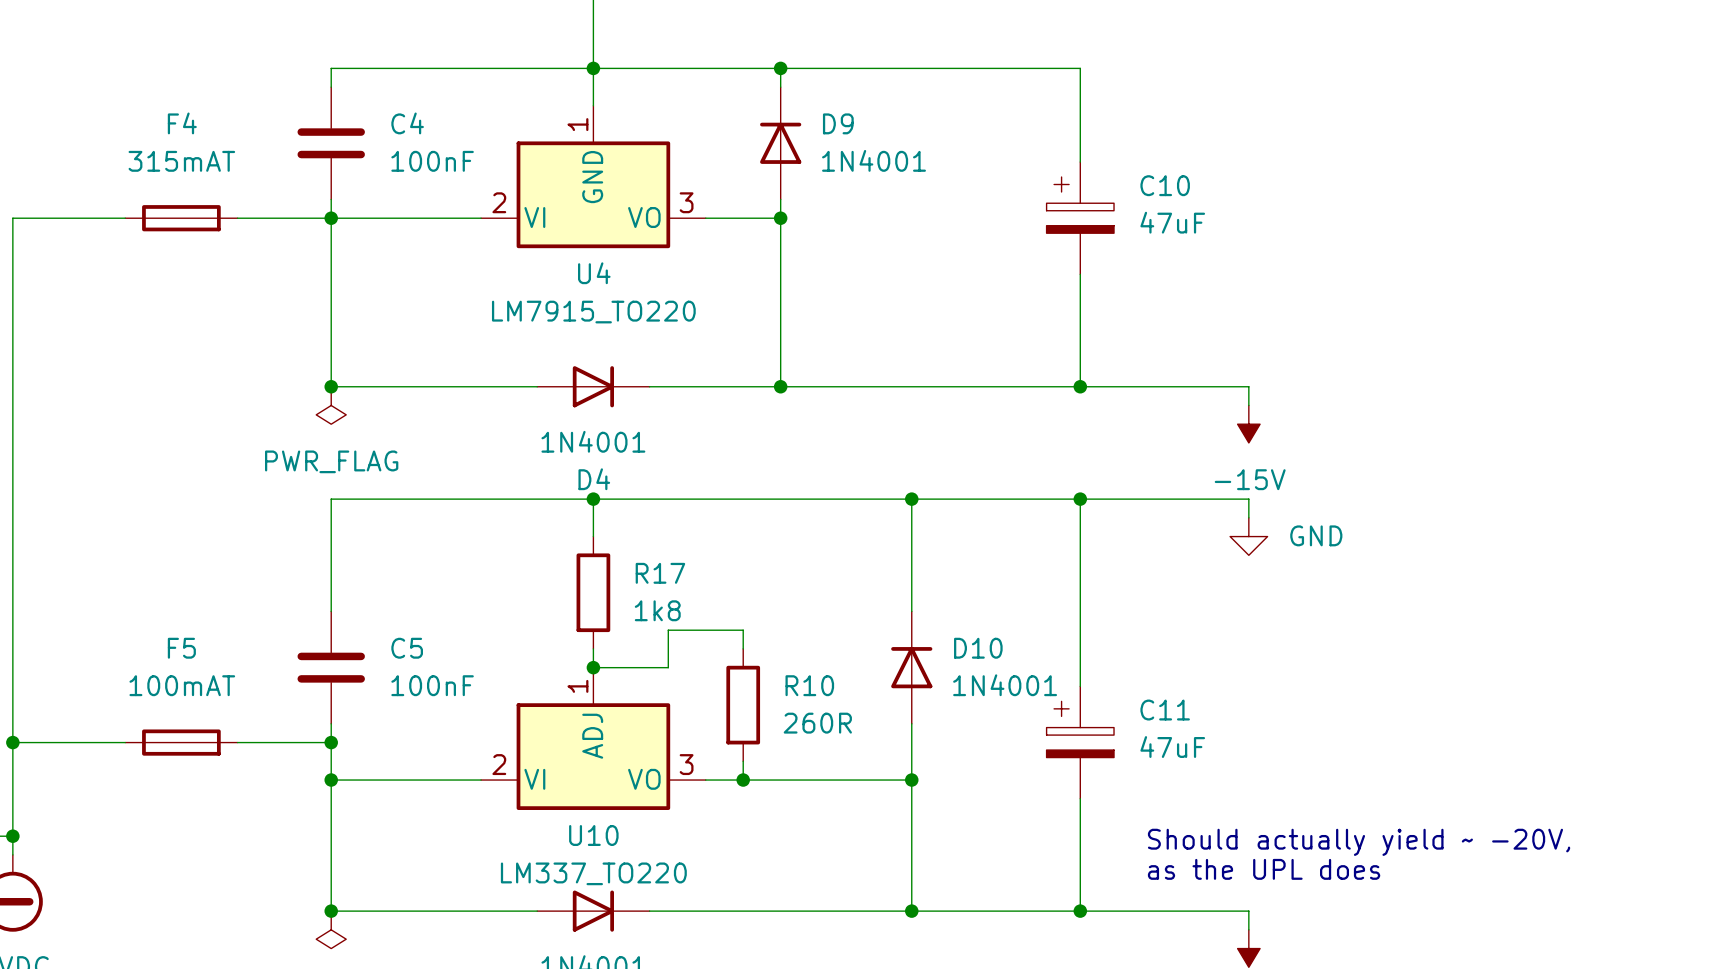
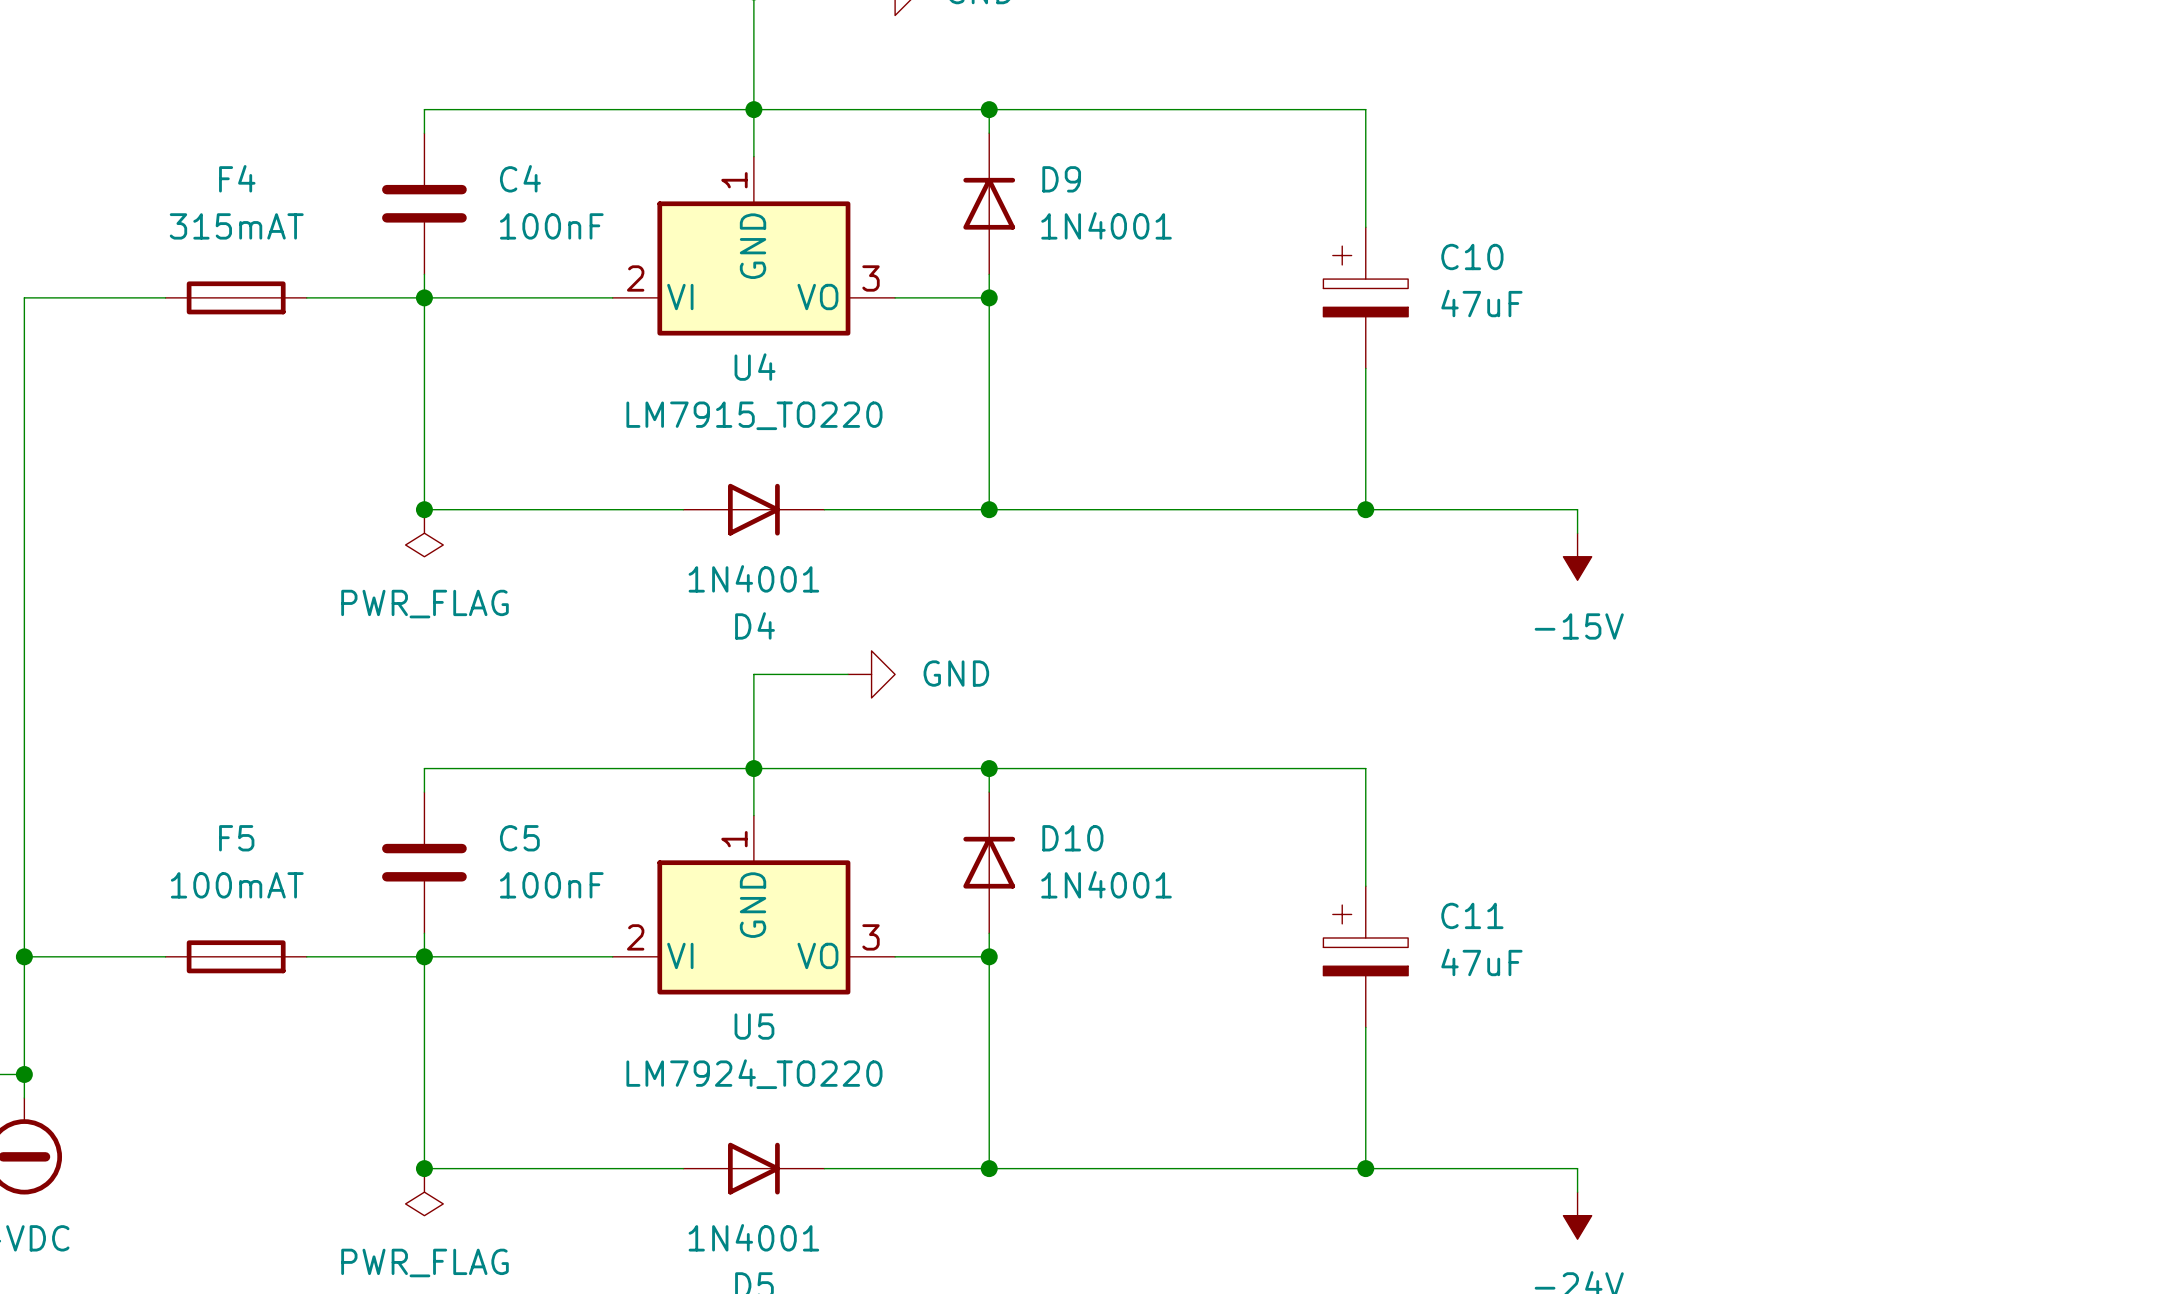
wire: (593, 499) (593, 517) -> (848, 674) (753, 674)
junction: (593, 499) -> none
wire: (911, 499) (911, 611) -> none
junction: (911, 499) -> none
wire: (1080, 499) (1080, 592) -> none
junction: (1080, 499) -> none
power symbol: none -> GND (871, 674)
wire: (1248, 517) (1248, 499) (331, 499) (331, 592) -> (1365, 768) (424, 768)
wire: none -> (753, 697) (753, 815)
power symbol: GND (1248, 536) -> none
junction: none -> (753, 768)
R17: 1k8 (593, 592) -> none
junction: none -> (989, 768)
wire: (593, 648) (593, 667) (668, 667) (668, 630) (743, 630) (743, 648) -> none
junction: (593, 667) -> none
D10 position: (911, 667) -> (989, 862)
U5: none -> LM7924_TO220 (753, 905)
R10: 260R (743, 705) -> none
wire: (911, 723) (911, 911) -> (989, 933) (989, 1168)
U10: LM337_TO220 (593, 738) -> none
wire: none -> (895, 956) (989, 956)
wire: (743, 761) (743, 780) -> (989, 768) (989, 792)
wire: (331, 780) (481, 780) -> (424, 956) (612, 956)
junction: (331, 780) -> none
wire: (705, 780) (911, 780) -> none
junction position: (743, 780) -> (989, 956)
junction: (911, 780) -> none
text: Should actually yield ~ -20V, (1359, 842) -> none
text: as the UPL does (1264, 869) -> none
junction: none -> (989, 1168)
junction: (911, 911) -> none

